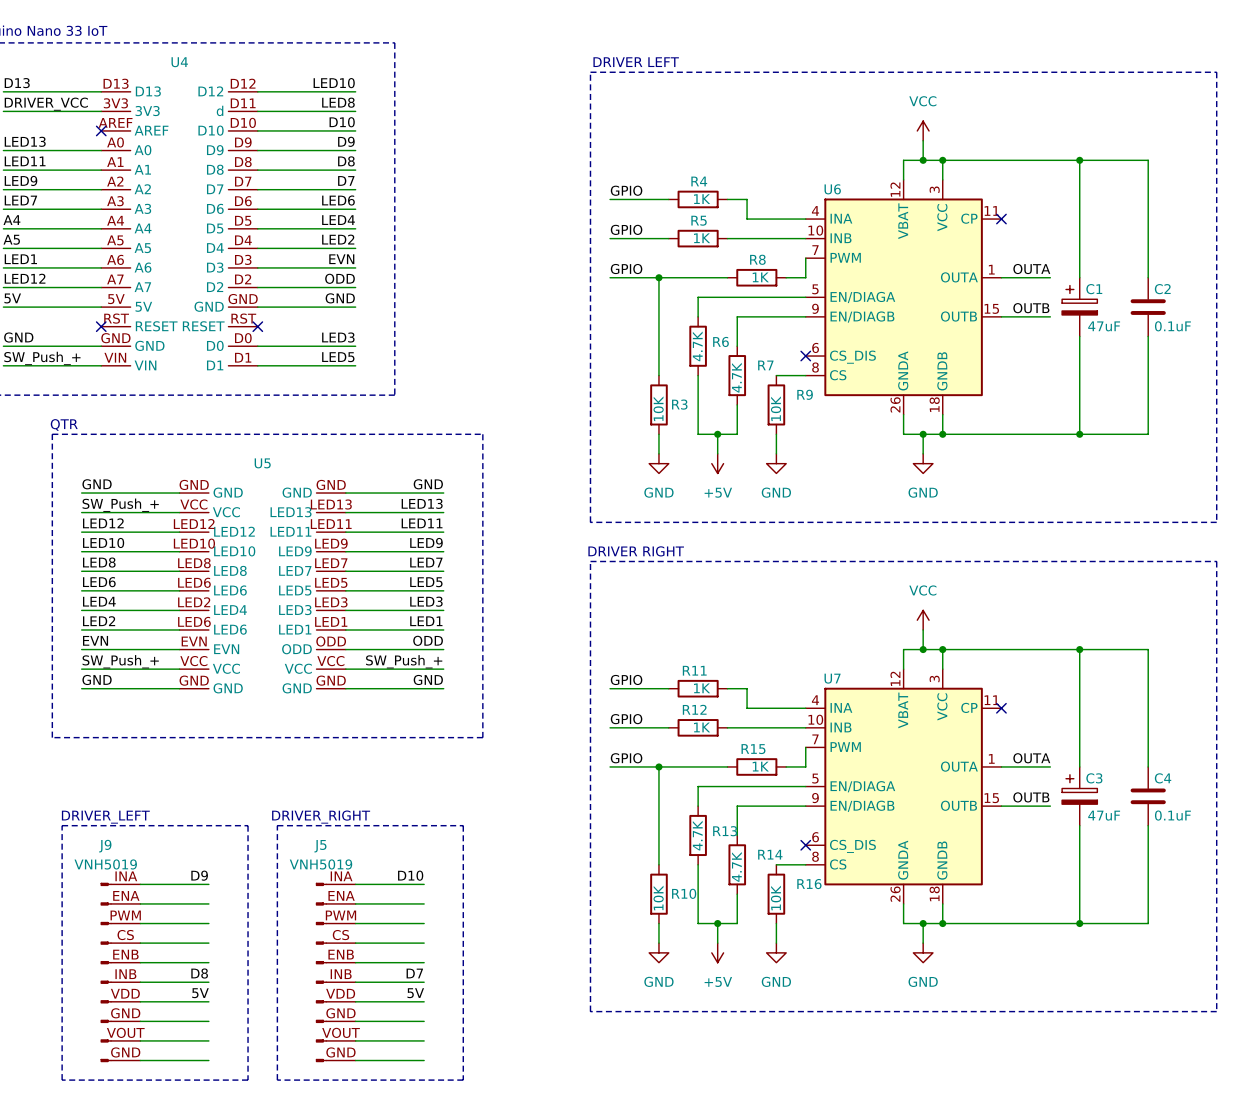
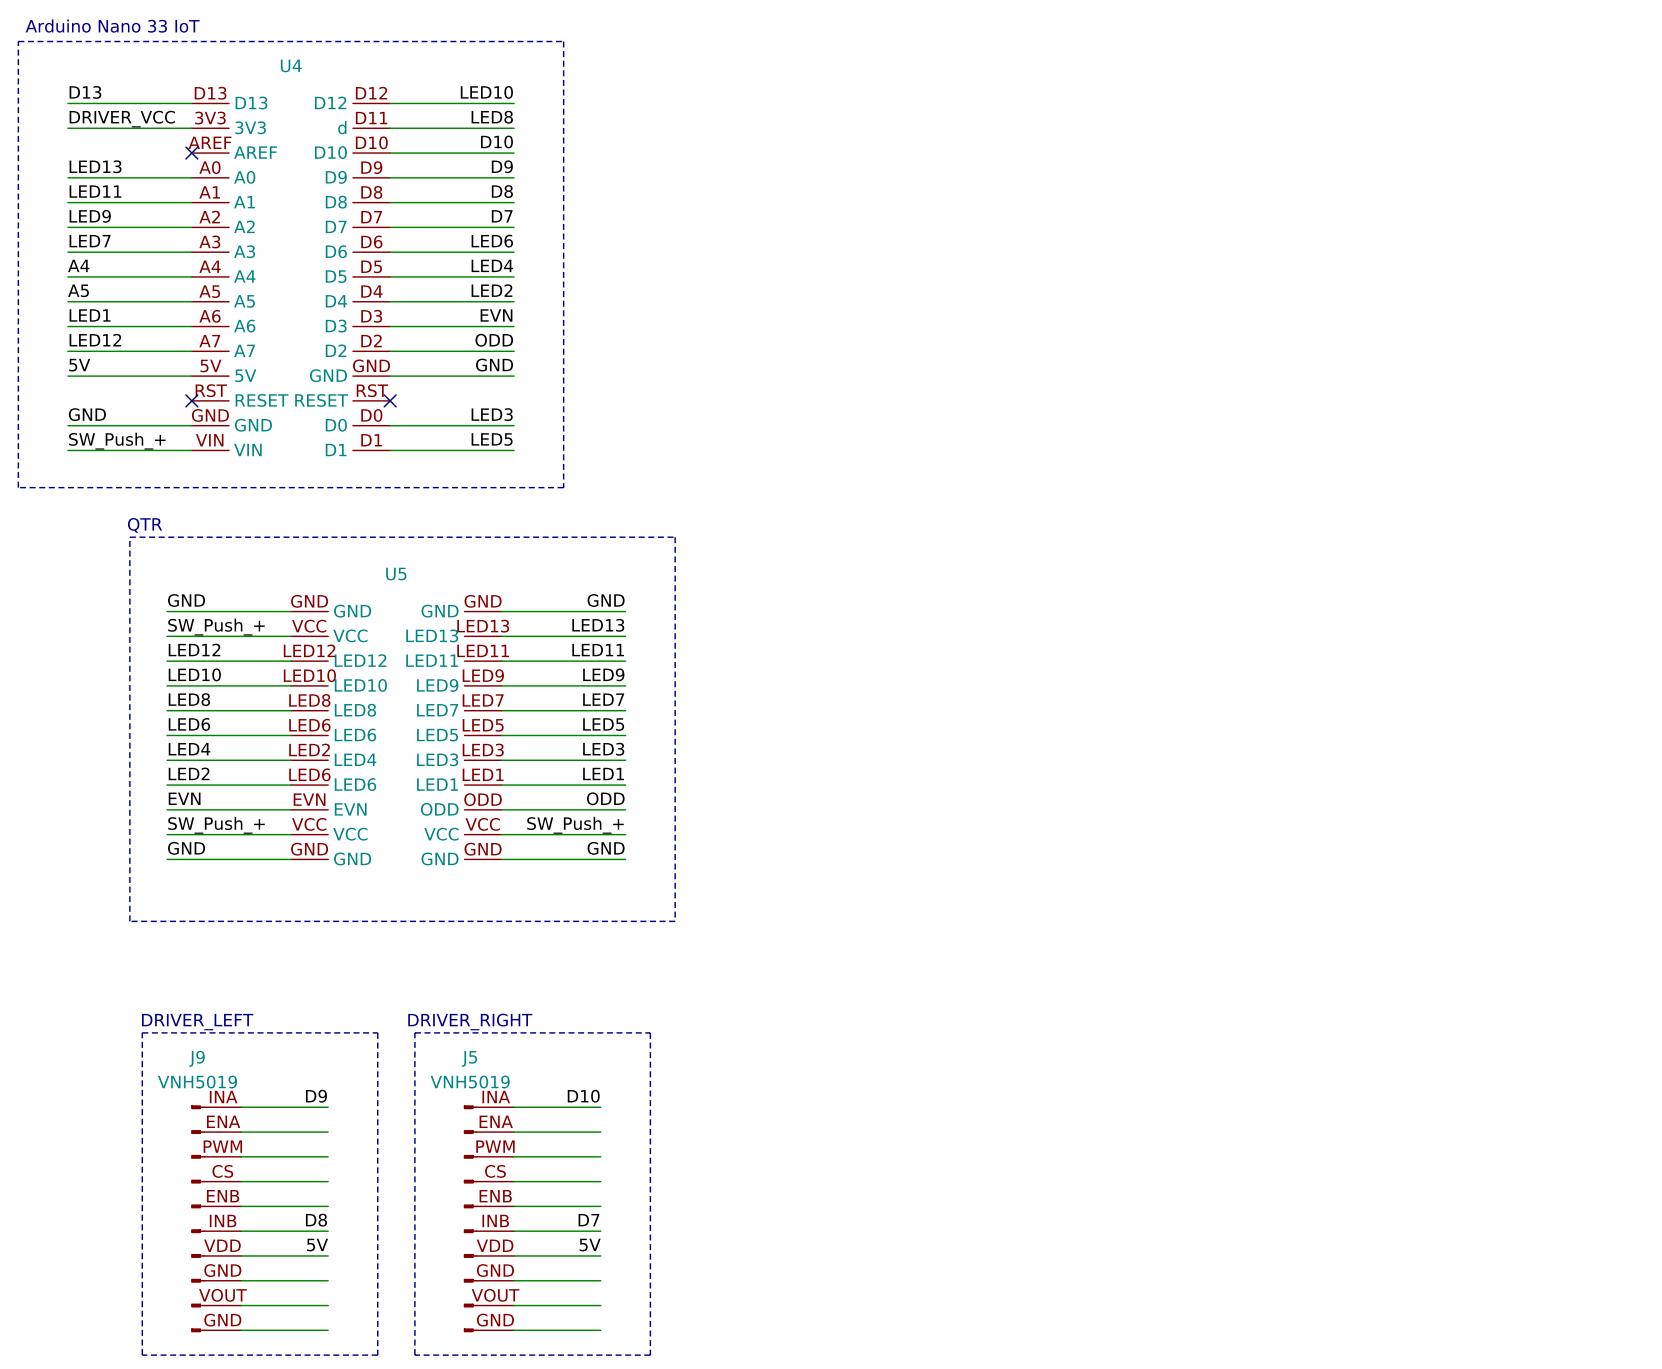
text: DRIVER LEFT (636, 62) -> none
line: (590, 72) (1216, 72) (1216, 522) (590, 522) (590, 72) -> none
power symbol: VCC (923, 130) -> none
wire: (923, 140) (923, 160) -> none
junction: (923, 160) -> none
wire: (942, 160) (942, 179) -> none
junction: (942, 160) -> none
wire: (1079, 160) (1079, 277) -> none
junction: (1079, 160) -> none
wire: (903, 179) (903, 160) (1148, 160) (1148, 277) -> none
label: GPIO (626, 190) -> none
wire: (610, 199) (668, 199) -> none
R4: 1K (698, 199) -> none
wire: (727, 199) (747, 199) (747, 219) (805, 219) -> none
no-connect mark: (1001, 219) -> none
label: GPIO (626, 229) -> none
wire: (610, 238) (668, 238) -> none
R5: 1K (698, 238) -> none
wire: (727, 238) (805, 238) -> none
wire: (805, 258) (805, 277) (786, 277) -> none
label: GPIO (626, 269) -> none
label: OUTA (1031, 269) -> none
wire: (610, 277) (727, 277) -> none
wire: (658, 277) (658, 375) -> none
junction: (658, 277) -> none
R8: 1K (756, 277) -> none
wire: (1001, 277) (1050, 277) -> none
wire: (805, 297) (698, 297) (698, 316) -> none
U6: (903, 297) -> none
C1: 47uF (1079, 307) -> none
C2: 0.1uF (1148, 307) -> none
label: OUTB (1031, 308) -> none
wire: (805, 316) (737, 316) (737, 346) -> none
wire: (1001, 316) (1050, 316) -> none
wire: (1079, 336) (1079, 434) -> none
wire: (1148, 336) (1148, 434) (903, 434) (903, 414) -> none
R6: 4.7K (698, 346) -> none
no-connect mark: (805, 356) -> none
wire: (698, 375) (698, 434) (737, 434) (737, 404) -> none
R7: 4.7K (737, 375) -> none
wire: (776, 375) (805, 375) -> none
R3: 10K (658, 404) -> none
R9: 10K (776, 404) -> none
wire: (942, 414) (942, 434) -> none
wire: (658, 434) (658, 453) -> none
wire: (717, 434) (717, 453) -> none
junction: (717, 434) -> none
wire: (776, 434) (776, 453) -> none
wire: (923, 434) (923, 453) -> none
junction: (923, 434) -> none
junction: (942, 434) -> none
junction: (1079, 434) -> none
power symbol: GND (658, 463) -> none
power symbol: +5V (717, 463) -> none
power symbol: GND (776, 463) -> none
power symbol: GND (923, 463) -> none
text: DRIVER RIGHT (636, 551) -> none
line: (590, 561) (590, 1011) (1216, 1011) (1216, 561) (590, 561) -> none
power symbol: VCC (923, 620) -> none
wire: (923, 629) (923, 649) -> none
junction: (923, 649) -> none
wire: (942, 649) (942, 669) -> none
junction: (942, 649) -> none
wire: (1079, 649) (1079, 766) -> none
junction: (1079, 649) -> none
wire: (903, 669) (903, 649) (1148, 649) (1148, 766) -> none
label: GPIO (626, 679) -> none
wire: (610, 688) (668, 688) -> none
R11: 1K (698, 688) -> none
wire: (727, 688) (747, 688) (747, 708) (805, 708) -> none
no-connect mark: (1001, 708) -> none
label: GPIO (626, 719) -> none
wire: (610, 727) (668, 727) -> none
R12: 1K (698, 727) -> none
wire: (727, 727) (805, 727) -> none
wire: (805, 747) (805, 766) (786, 766) -> none
label: GPIO (626, 758) -> none
label: OUTA (1031, 758) -> none
wire: (610, 766) (727, 766) -> none
wire: (658, 766) (658, 864) -> none
junction: (658, 766) -> none
R15: 1K (756, 766) -> none
wire: (1001, 766) (1050, 766) -> none
wire: (805, 786) (698, 786) (698, 806) -> none
U7: (903, 786) -> none
C3: 47uF (1079, 796) -> none
C4: 0.1uF (1148, 796) -> none
label: OUTB (1031, 797) -> none
wire: (805, 806) (737, 806) (737, 835) -> none
wire: (1001, 806) (1050, 806) -> none
wire: (1079, 825) (1079, 923) -> none
wire: (1148, 825) (1148, 923) (903, 923) (903, 903) -> none
R13: 4.7K (698, 835) -> none
no-connect mark: (805, 845) -> none
wire: (698, 864) (698, 923) (737, 923) (737, 894) -> none
R14: 4.7K (737, 864) -> none
wire: (776, 864) (805, 864) -> none
R10: 10K (658, 894) -> none
R16: 10K (776, 894) -> none
wire: (942, 903) (942, 923) -> none
wire: (658, 923) (658, 943) -> none
wire: (717, 923) (717, 943) -> none
junction: (717, 923) -> none
wire: (776, 923) (776, 943) -> none
wire: (923, 923) (923, 943) -> none
junction: (923, 923) -> none
junction: (942, 923) -> none
junction: (1079, 923) -> none
power symbol: GND (658, 952) -> none
power symbol: +5V (717, 952) -> none
power symbol: GND (776, 952) -> none
power symbol: GND (923, 952) -> none

